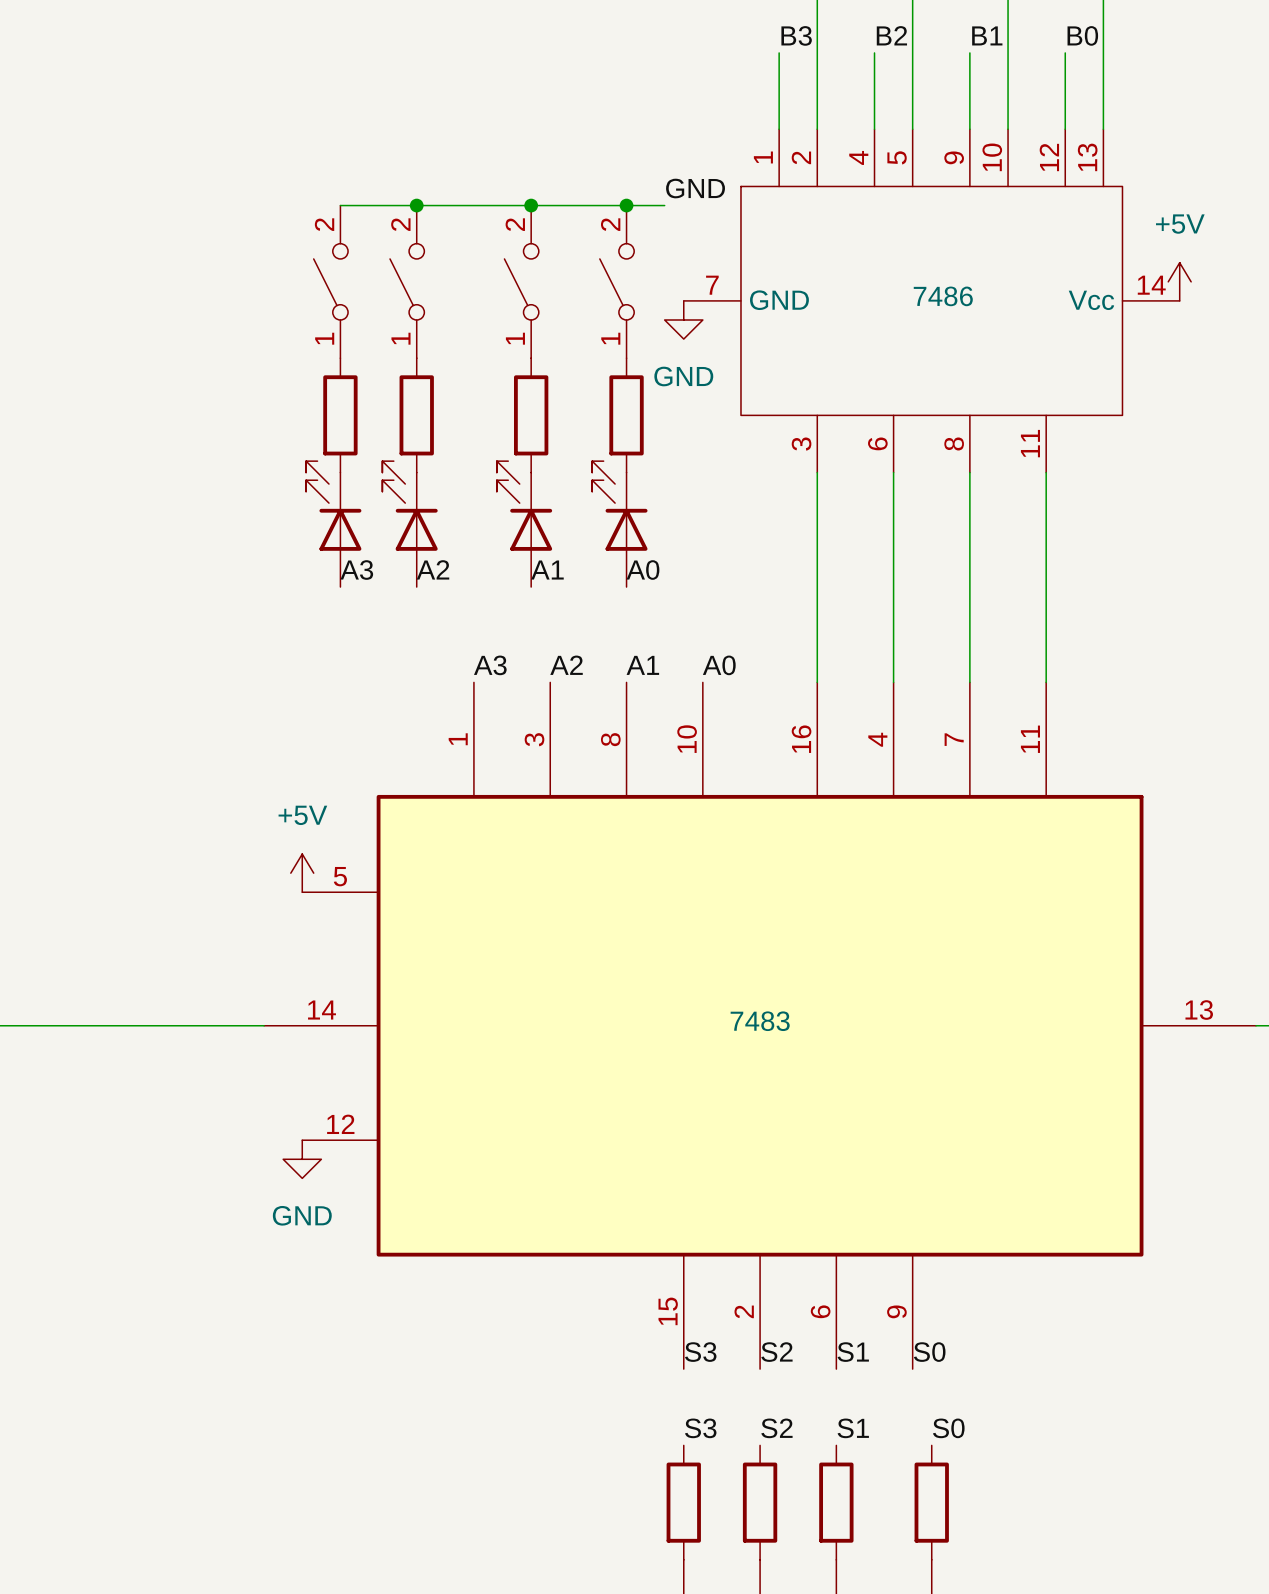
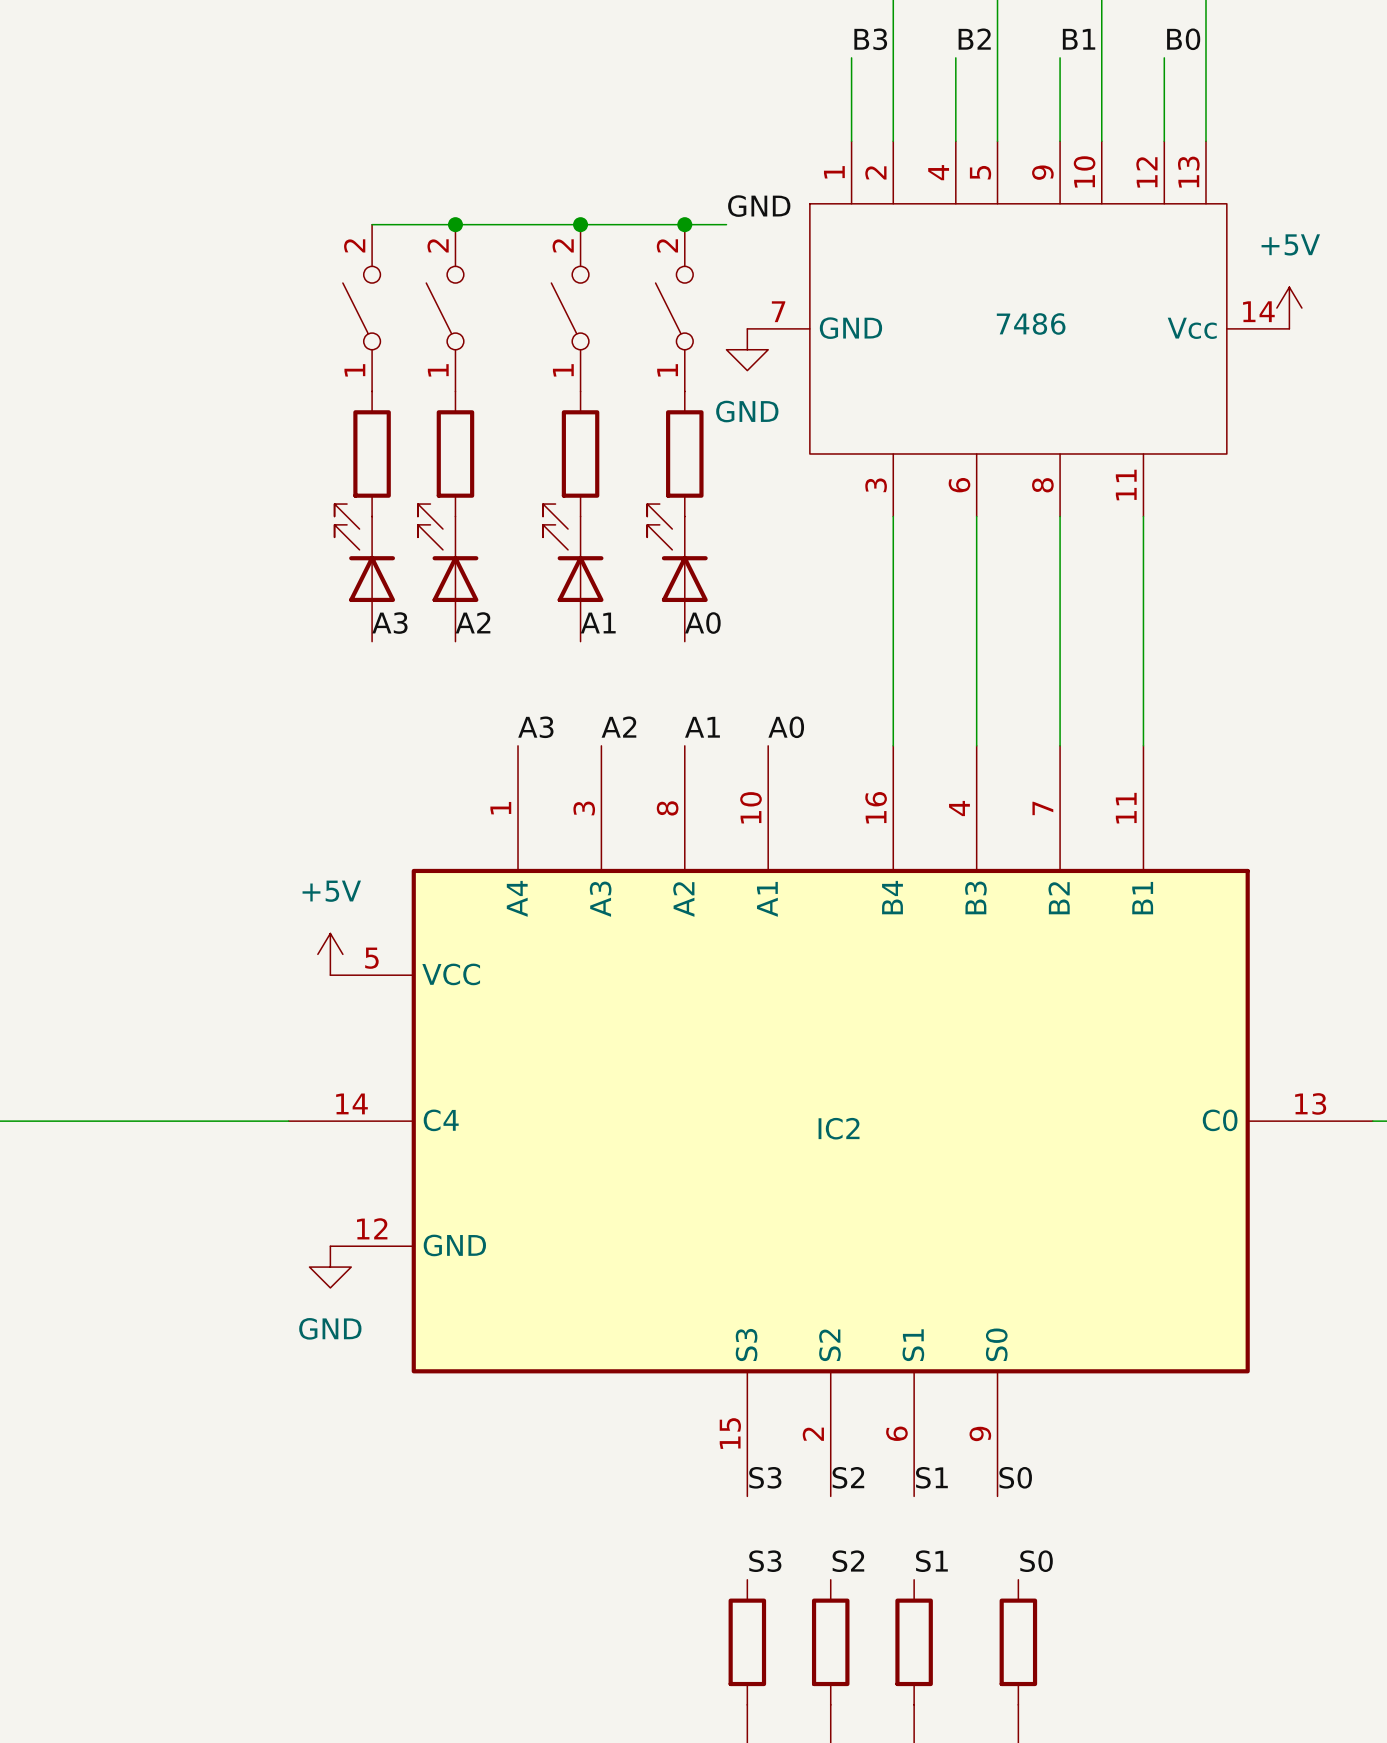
IC2 symbol: [264, 682, 1257, 1370] -> [288, 745, 1373, 1497]
IC2 value: 7483 (760, 1021) -> none
IC2 name: none -> IC2 (839, 1128)

